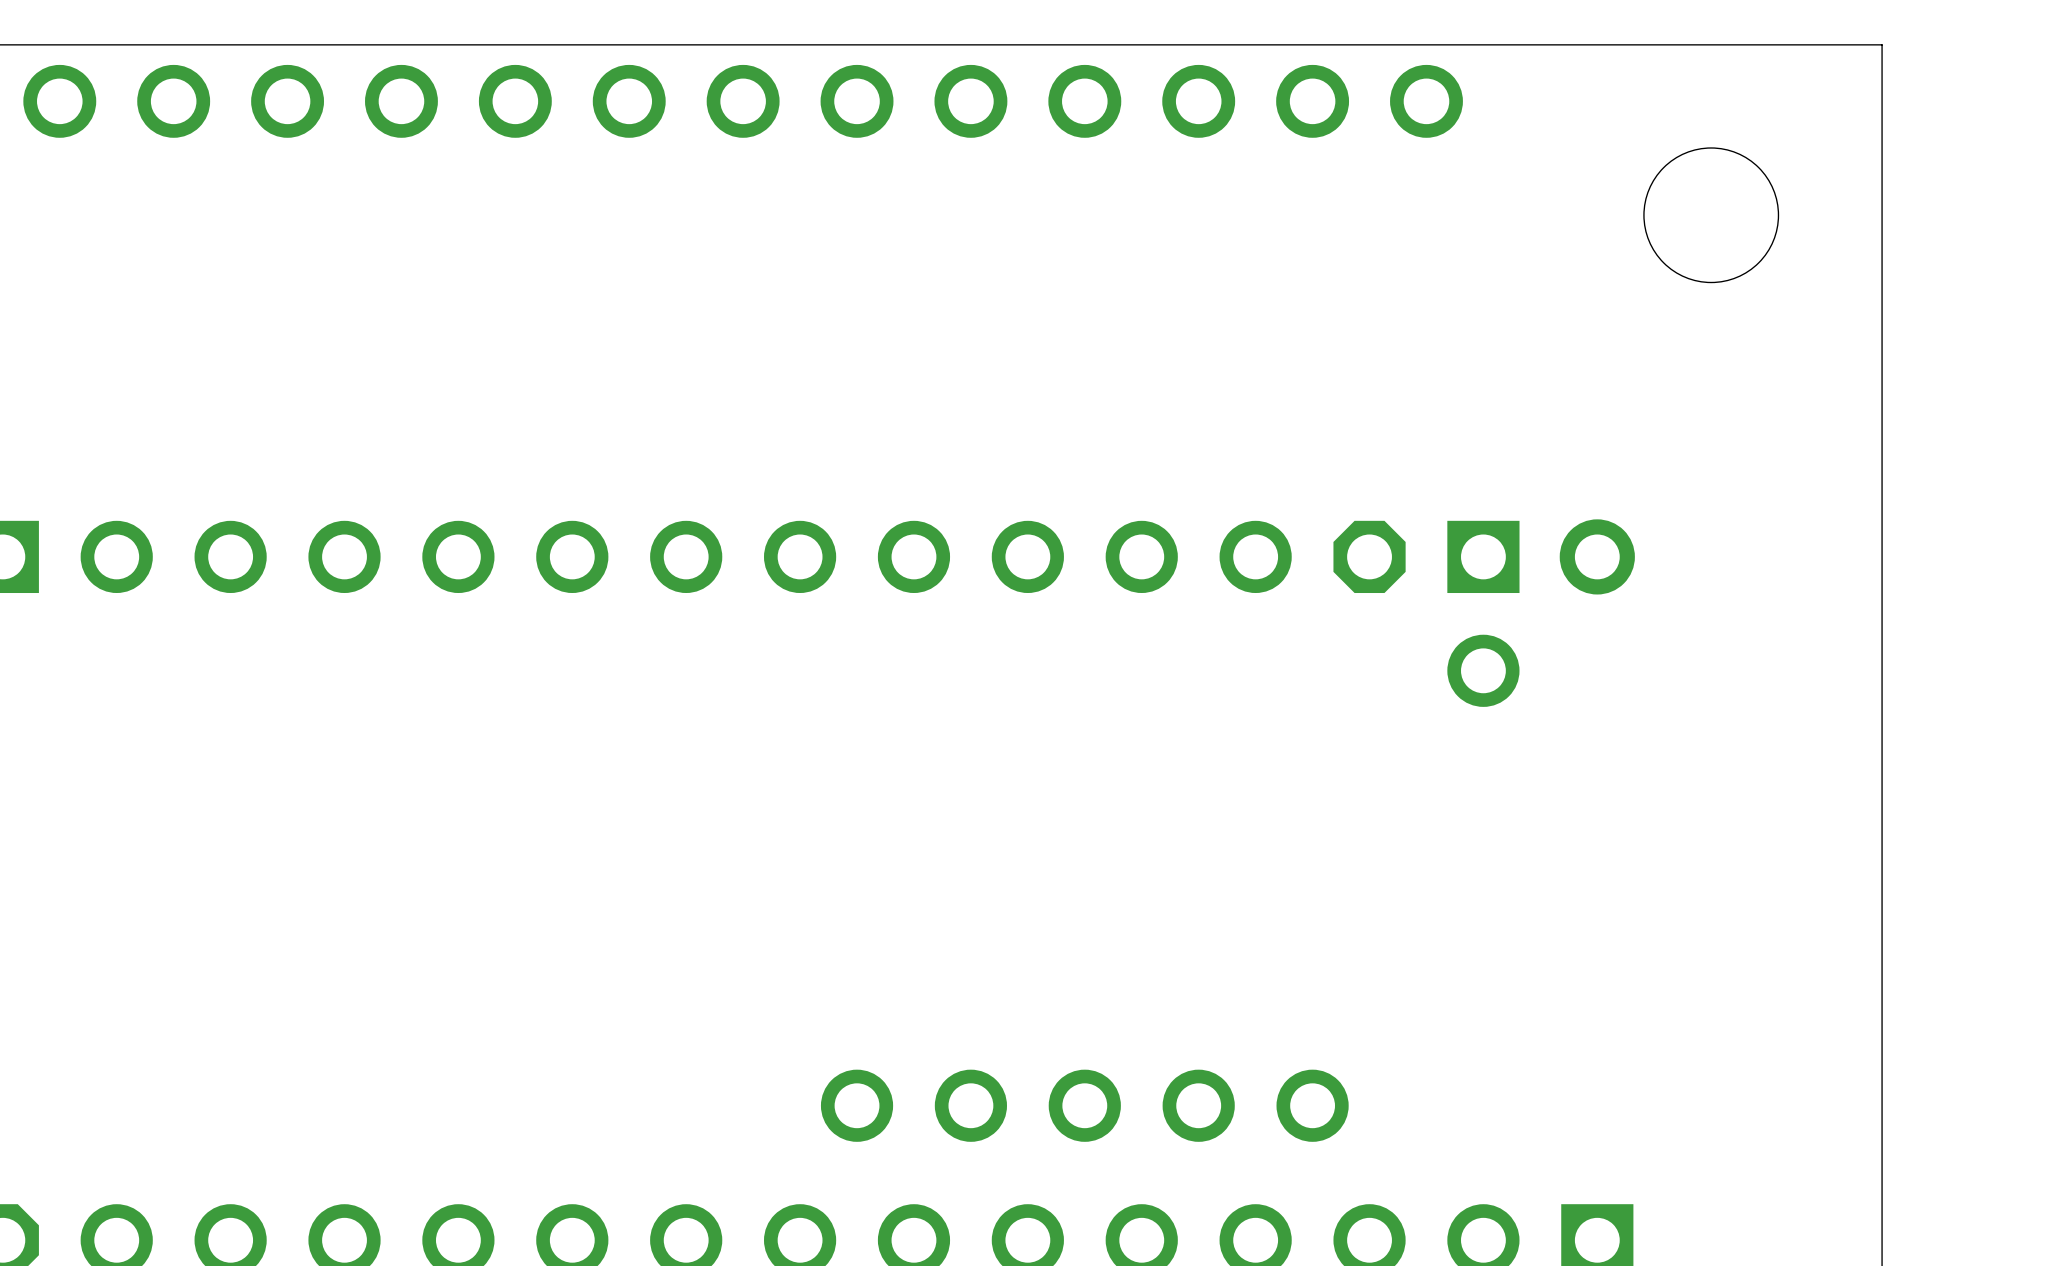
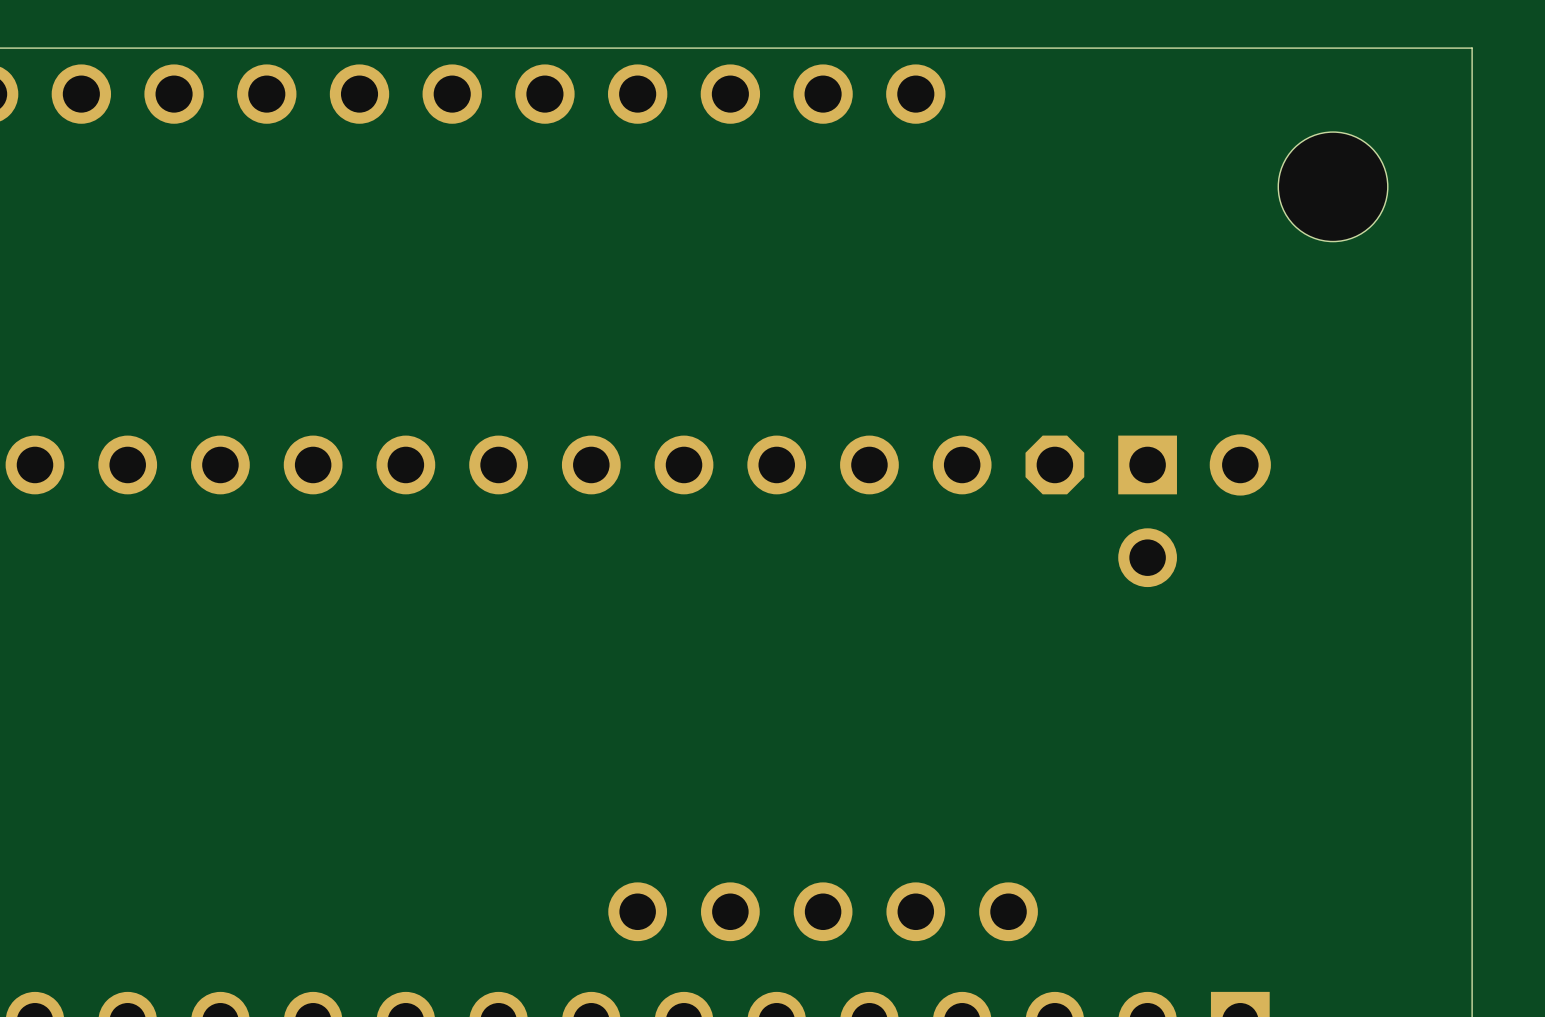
part: (1312, 101) -> none
part: (1426, 101) -> none

